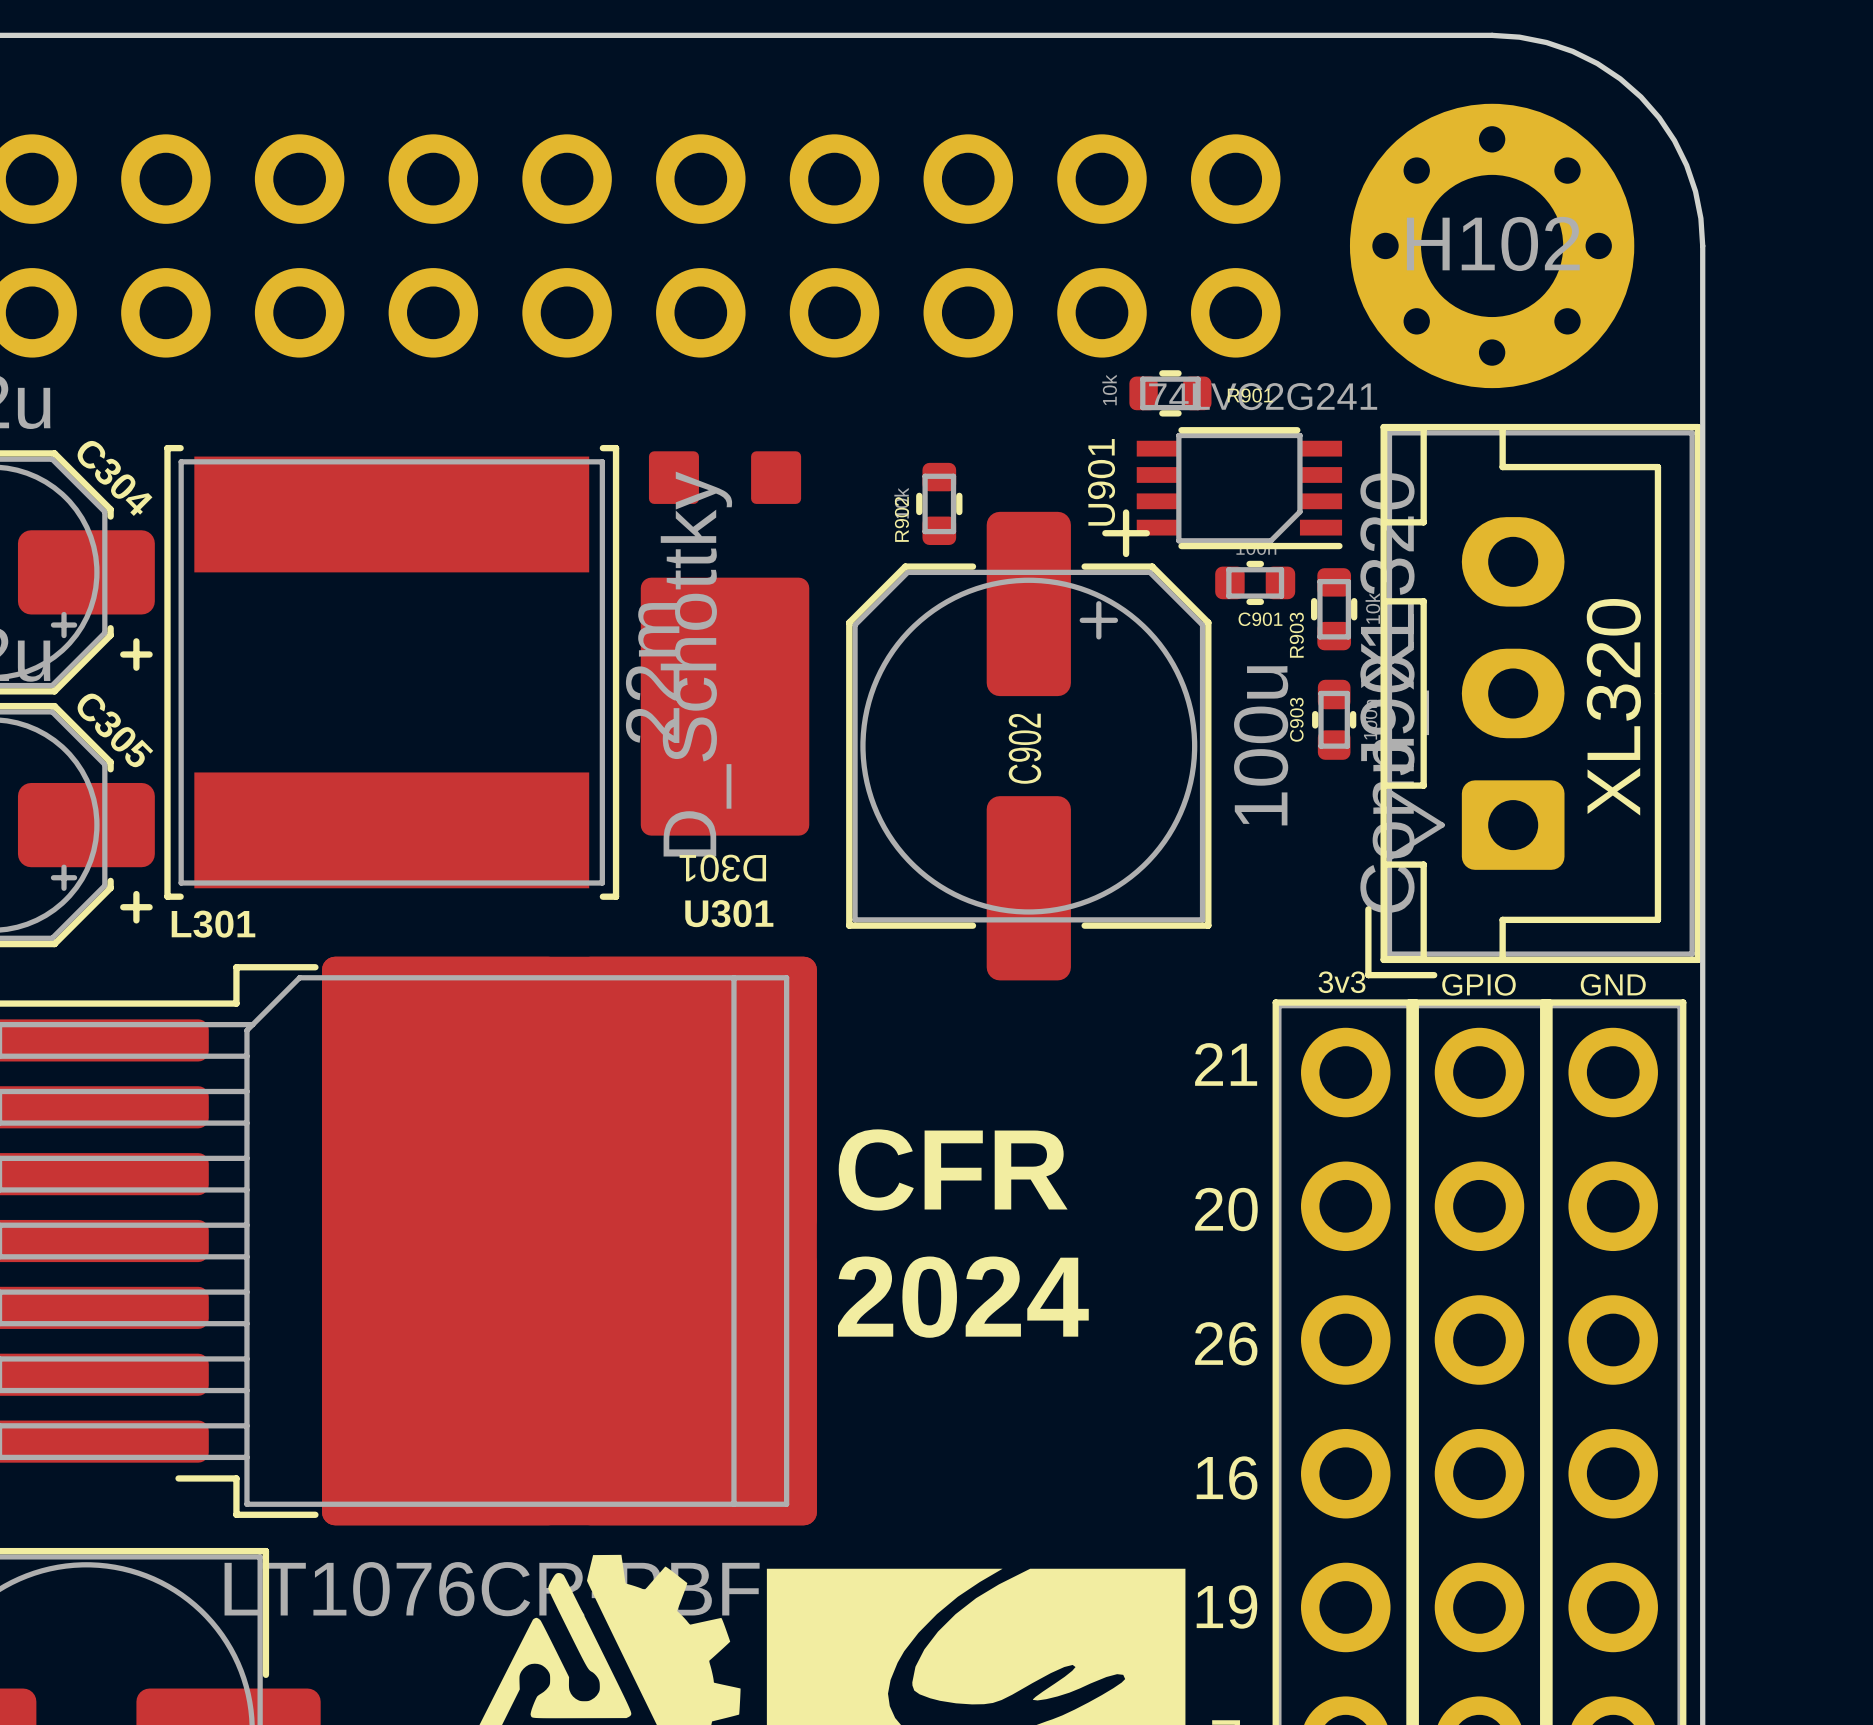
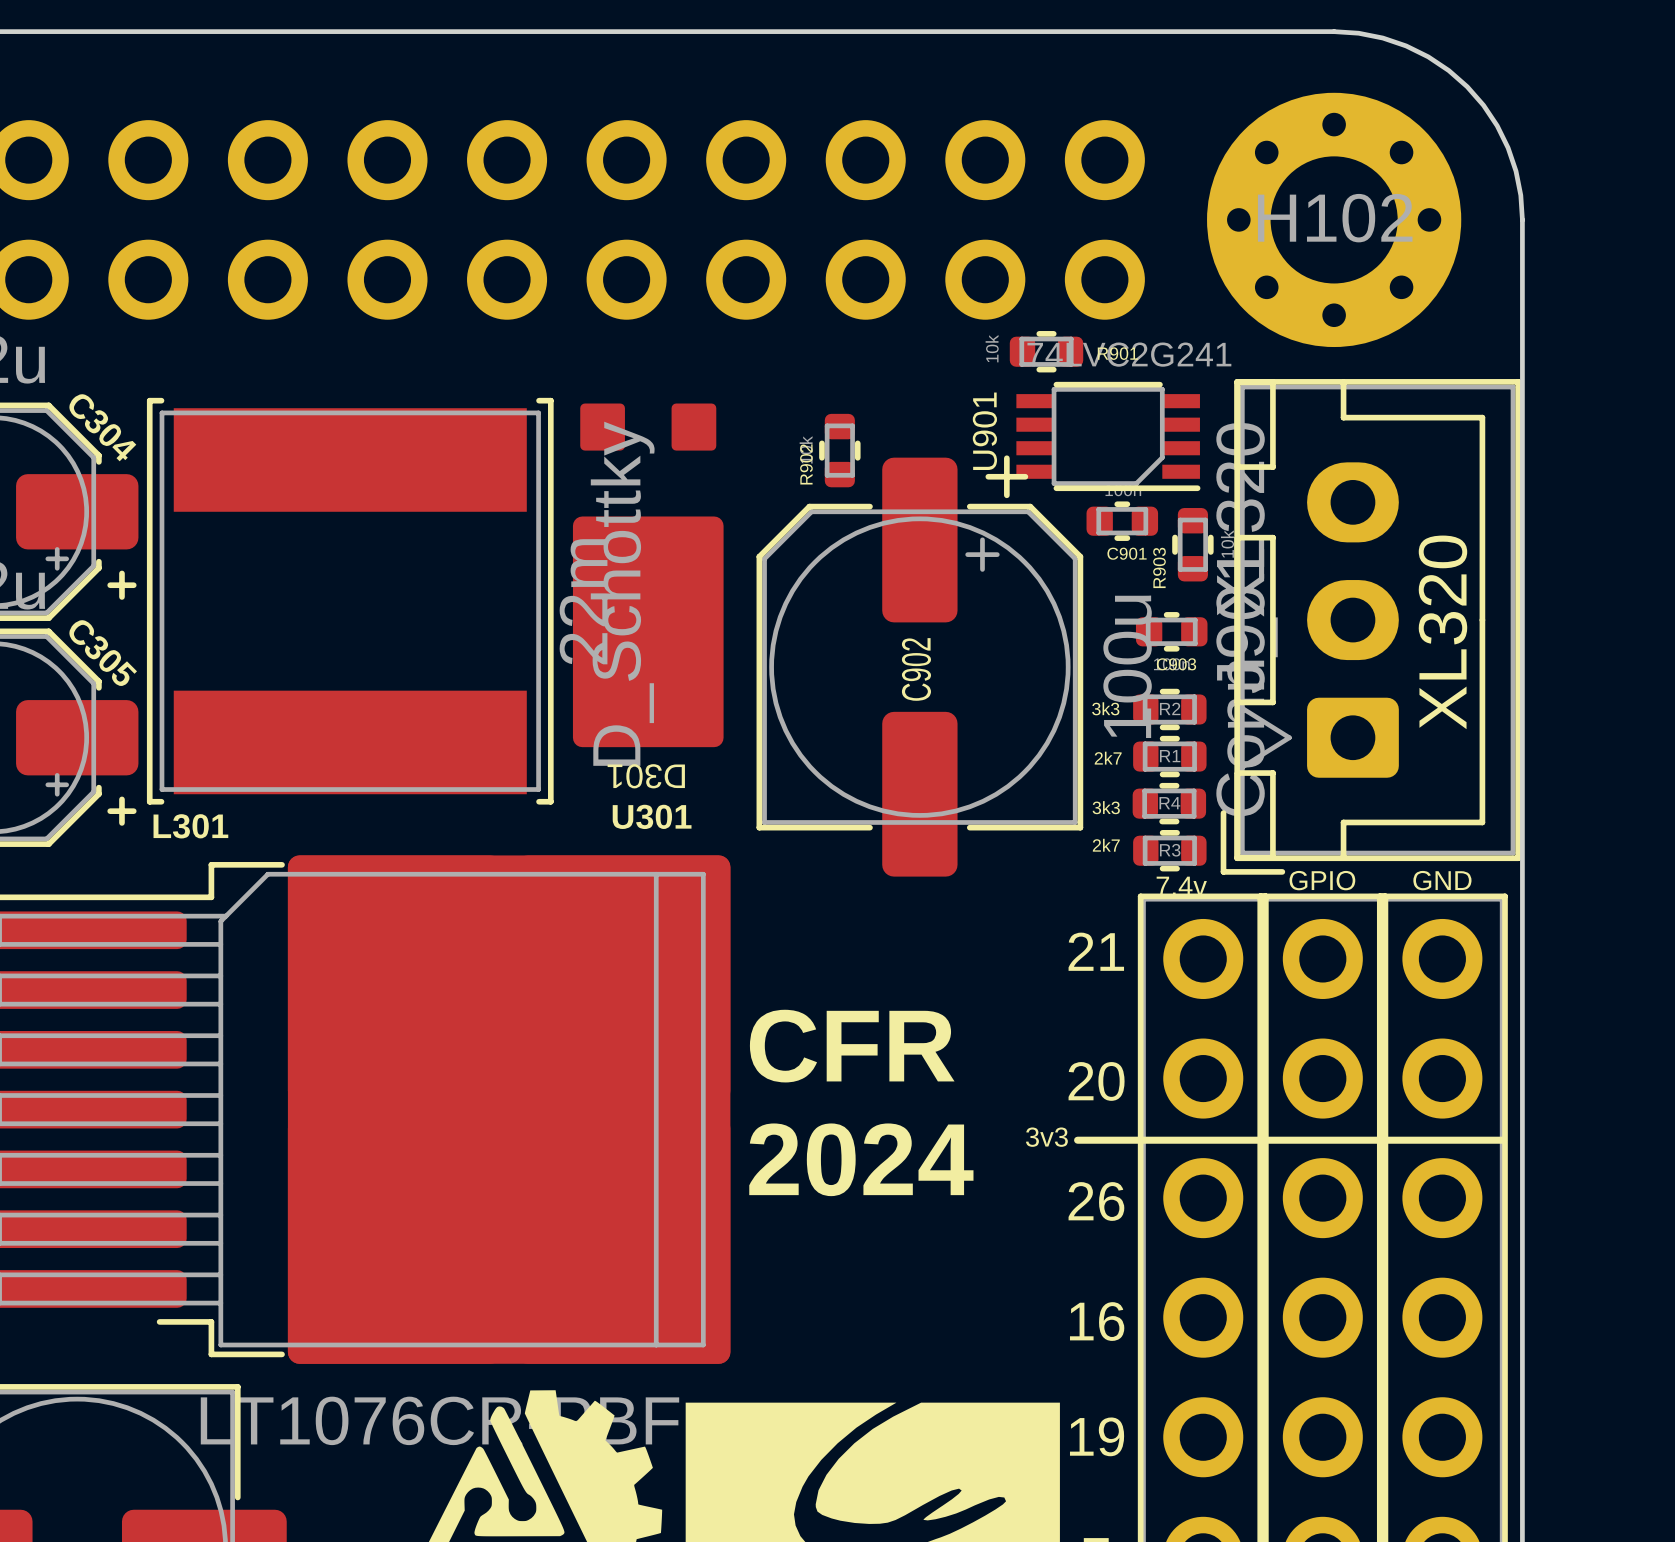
C903 rotation: 0° (1334, 719) -> 90° clockwise (1171, 631)
R2: none -> 3k3 (1169, 709)
R1: none -> 2k7 (1169, 756)
R4: none -> 3k3 (1169, 803)
R3: none -> 2k7 (1169, 850)
part text position: 3v3 (1341, 982) -> 3v3 (1046, 1137)
text: none -> 7.4v (1181, 886)
line: none -> (1077, 1140) (1503, 1140)

